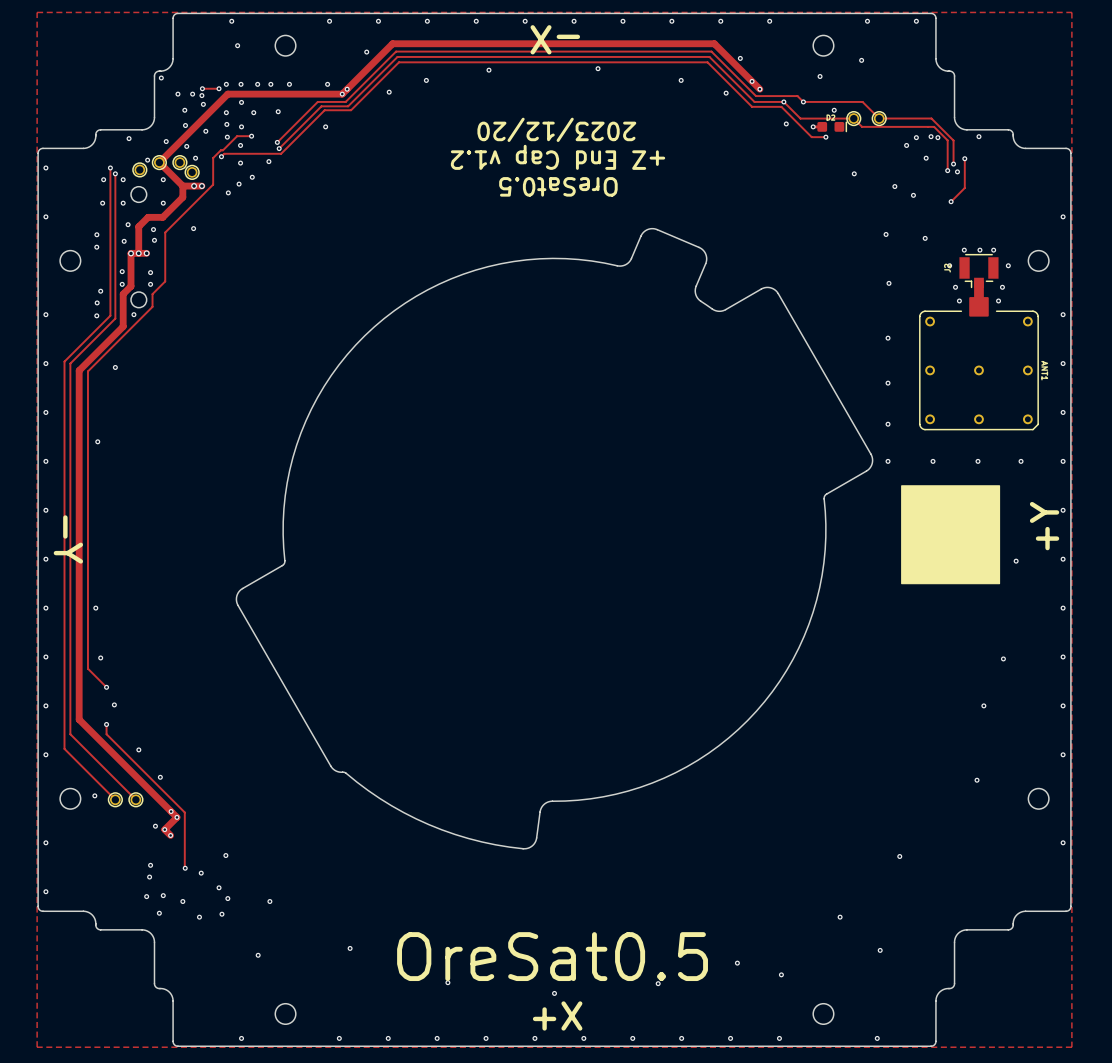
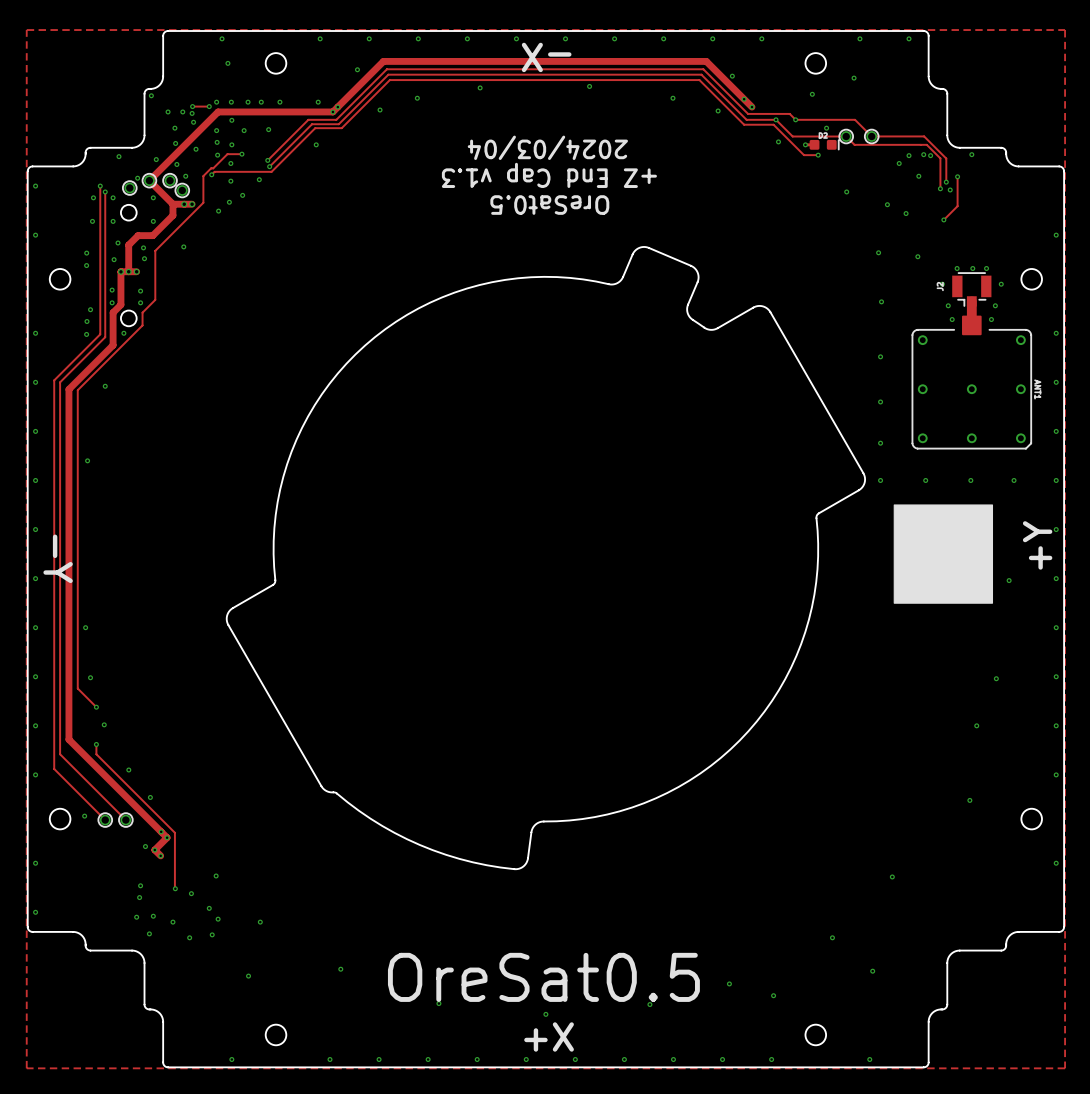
text: 2023/12/20 (556, 129) -> 2024/03/04 (547, 147)
text: +Z End Cap v1.2 (558, 157) -> +Z End Cap v1.3 (549, 175)

